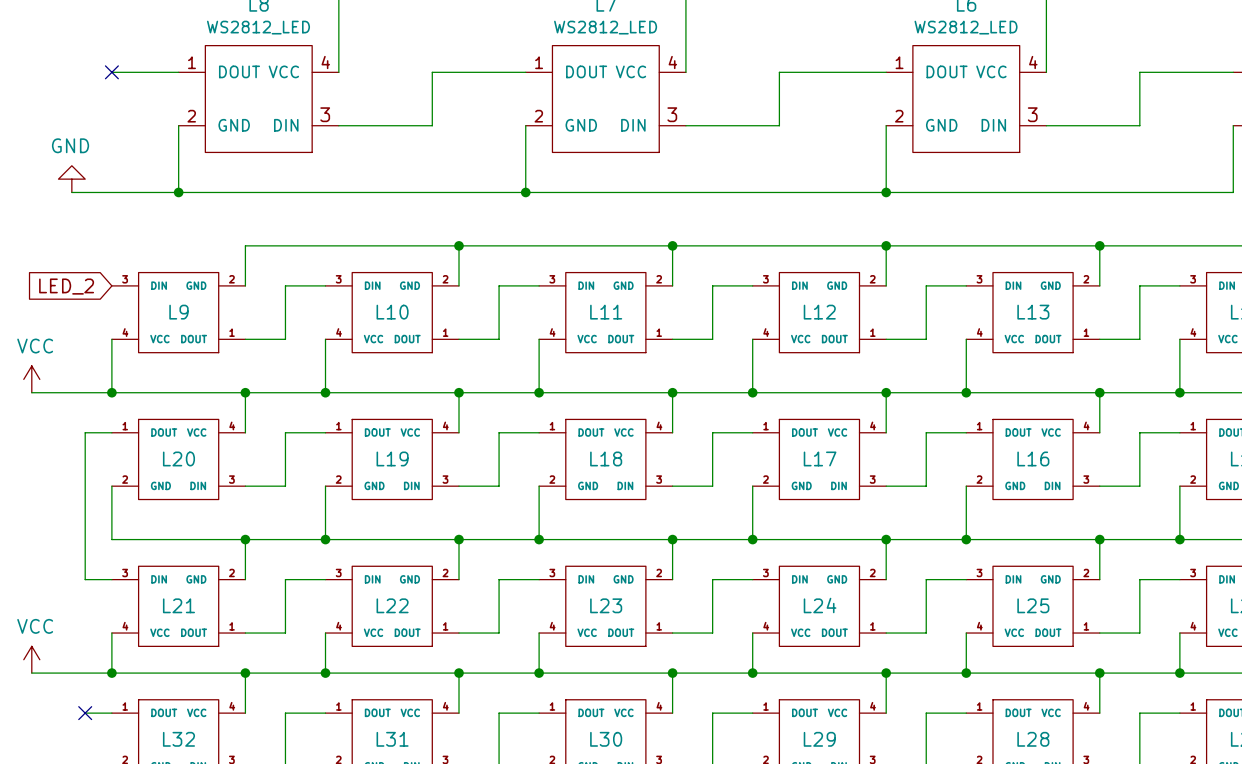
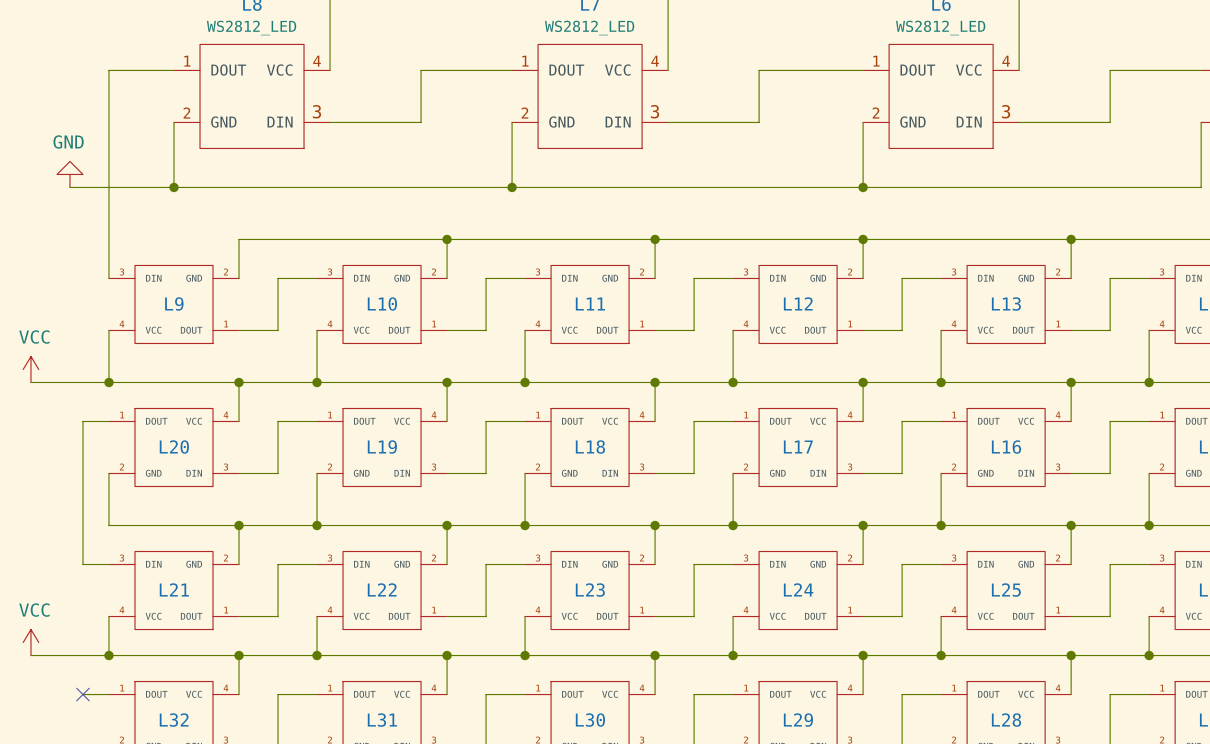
wire: none -> (108, 70) (108, 278)
no-connect mark: (111, 72) -> none
global label: LED_2 (66, 286) -> none

